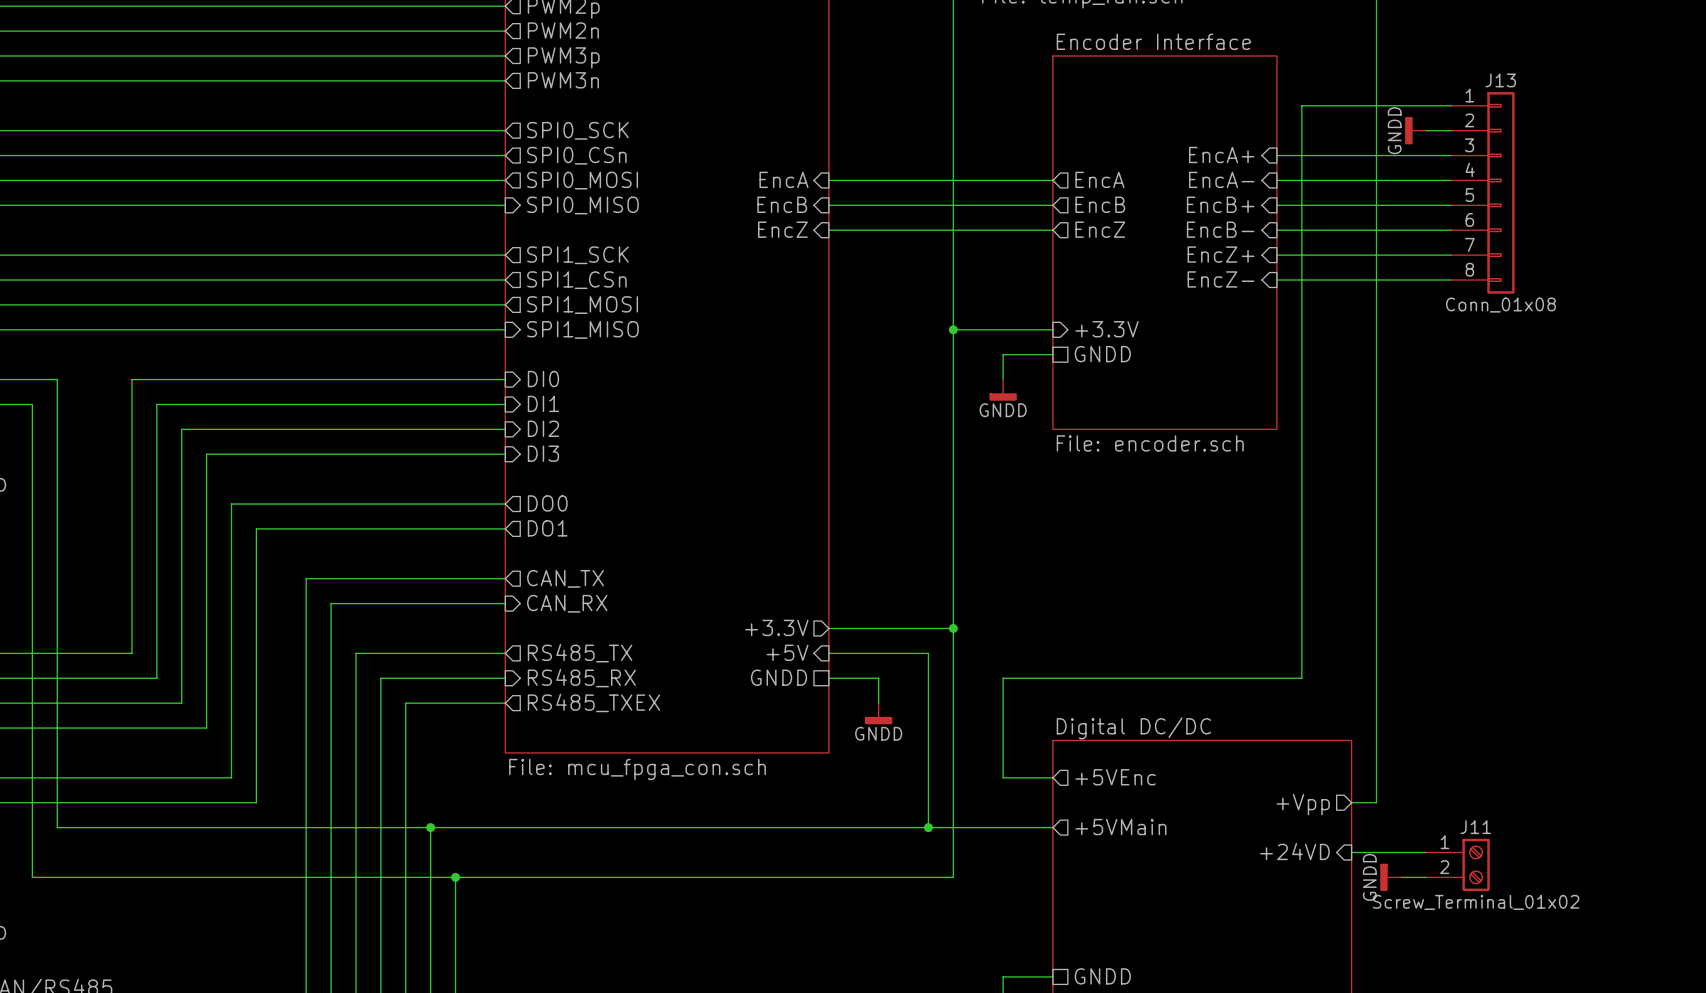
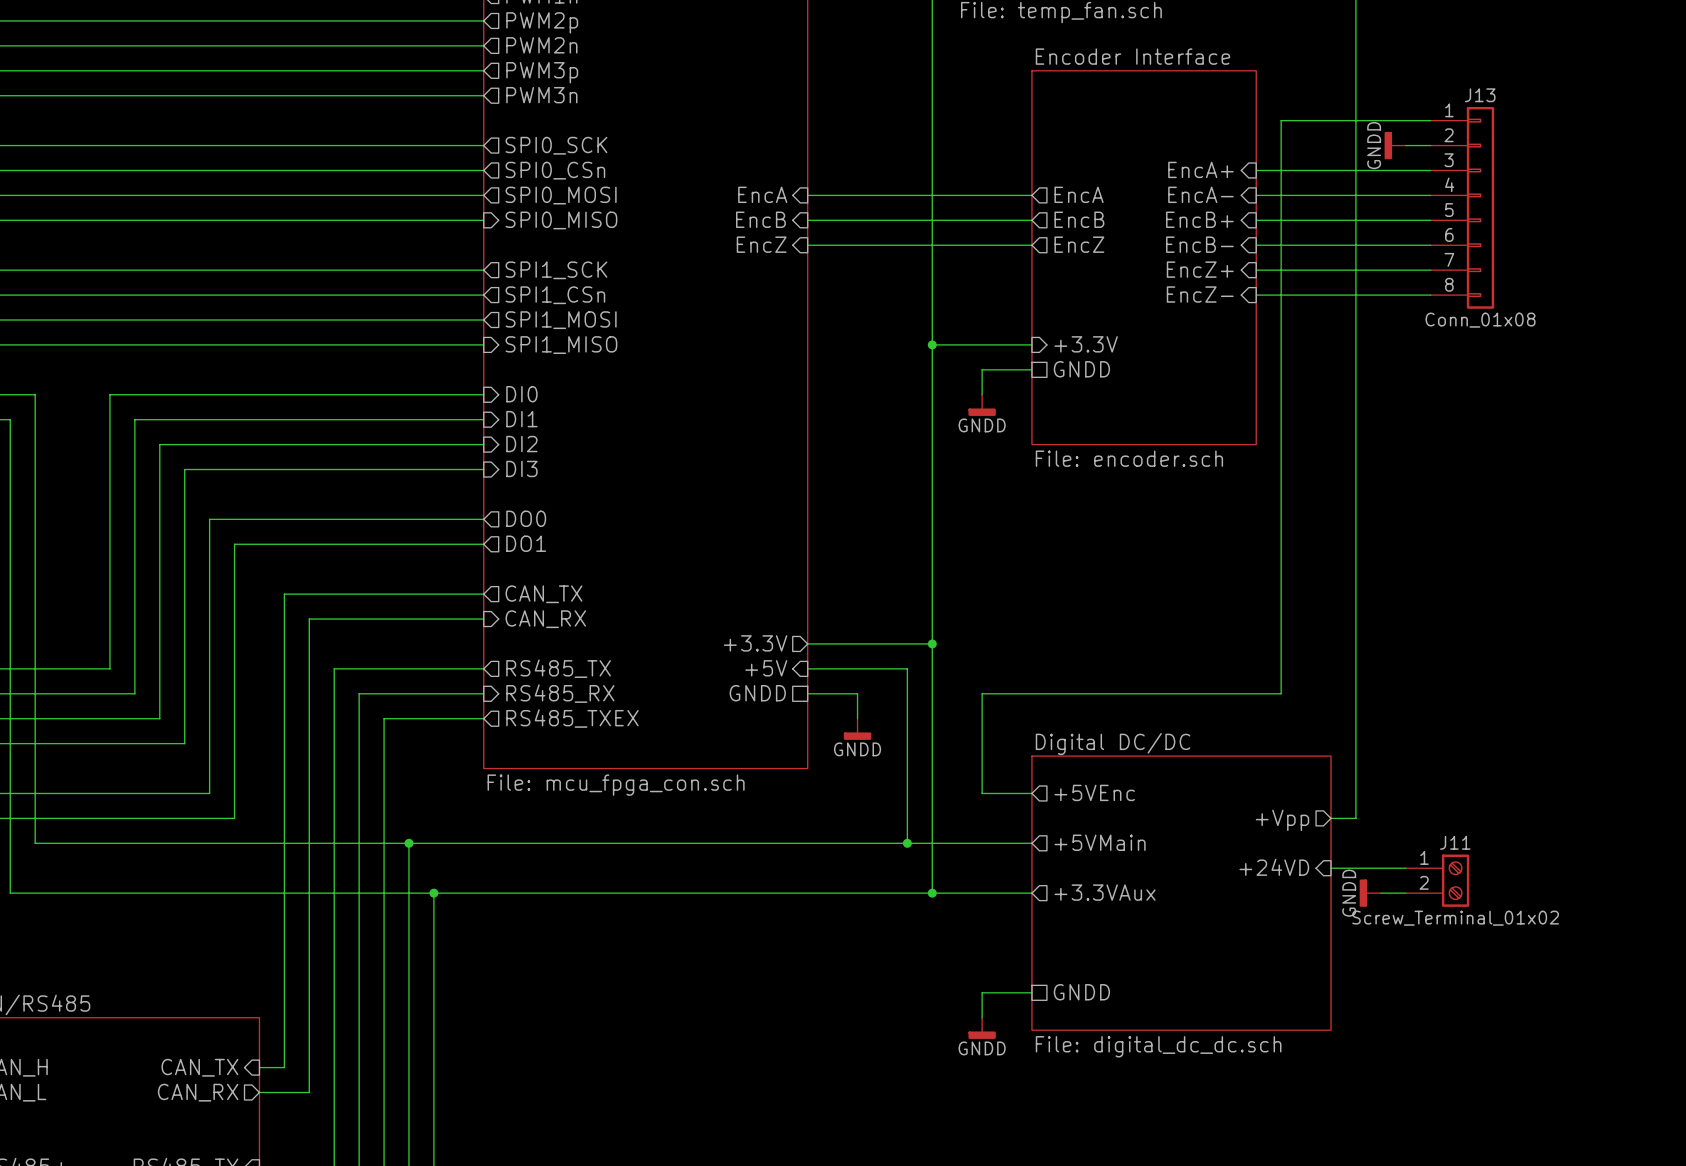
sheet pin: none -> +3.3VAux (1105, 892)
wire: none -> (932, 893) (1031, 893)
junction: none -> (932, 893)

